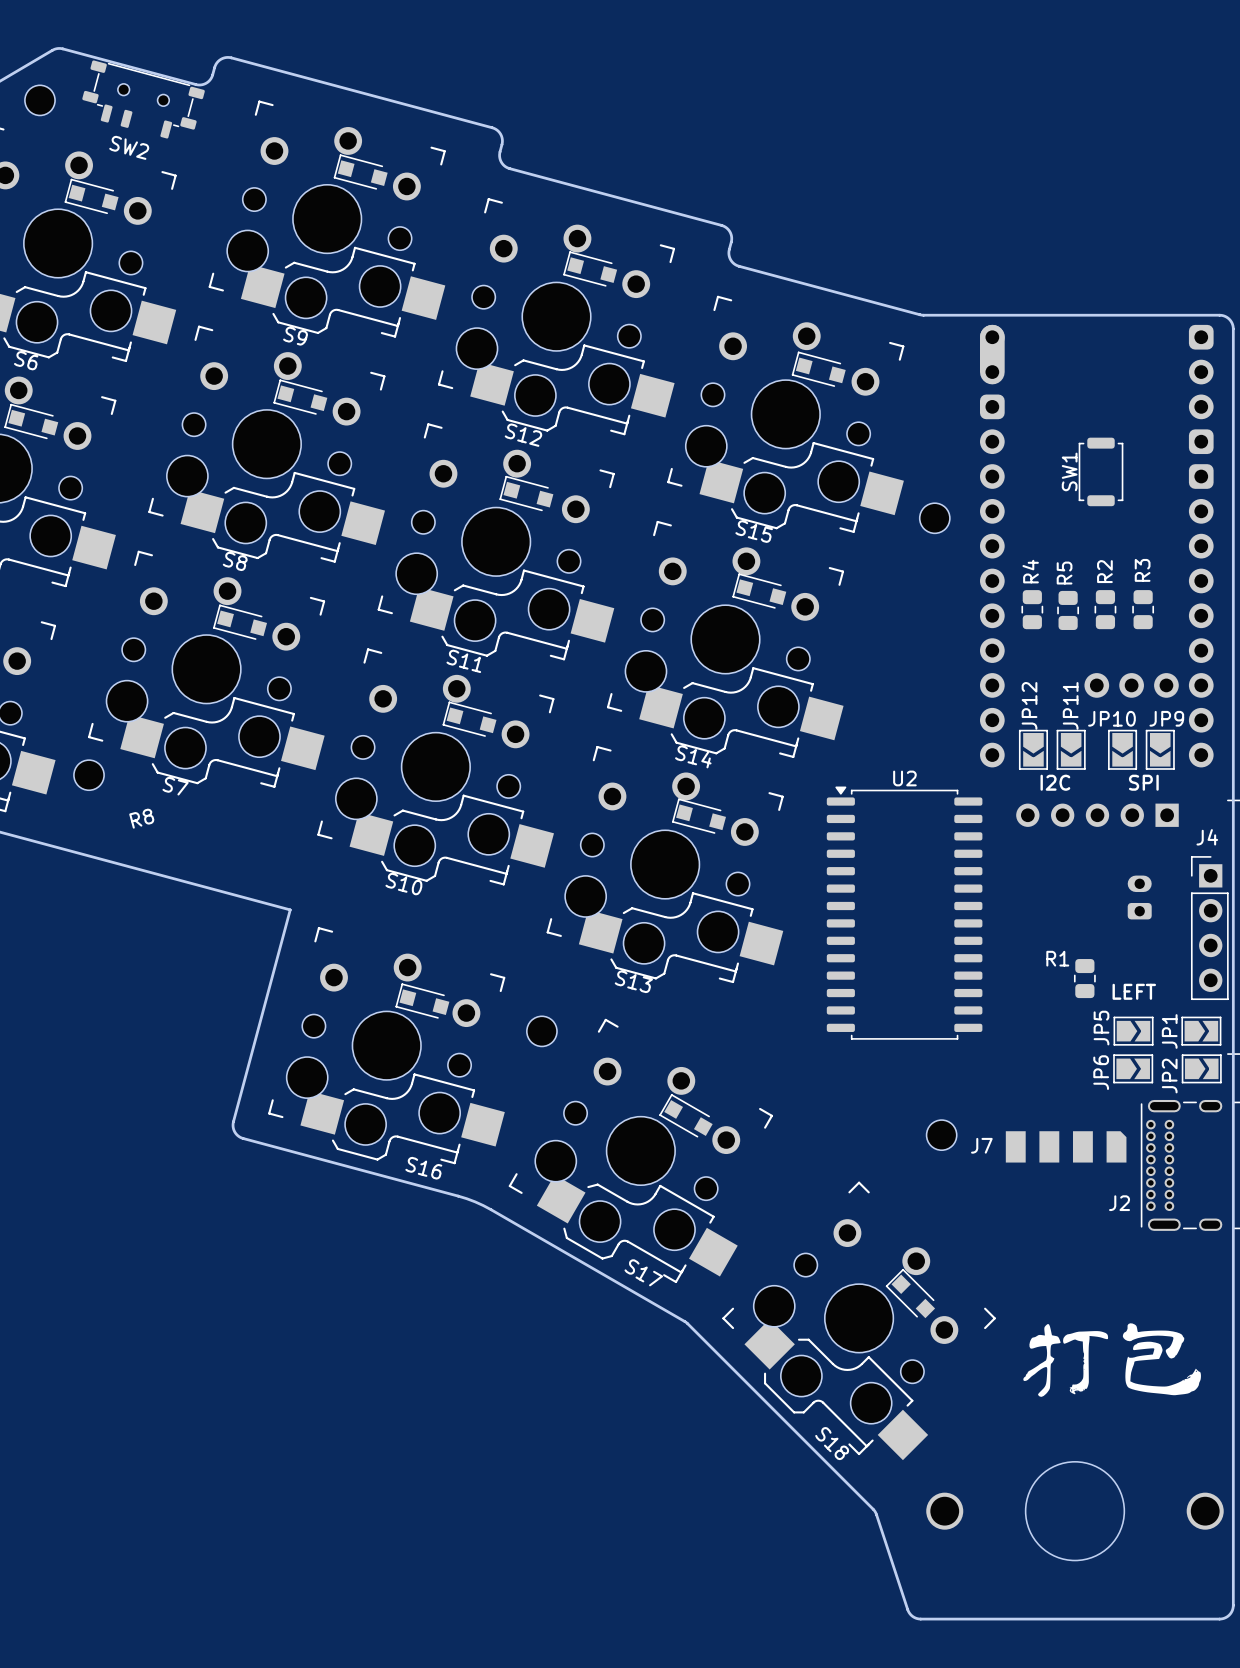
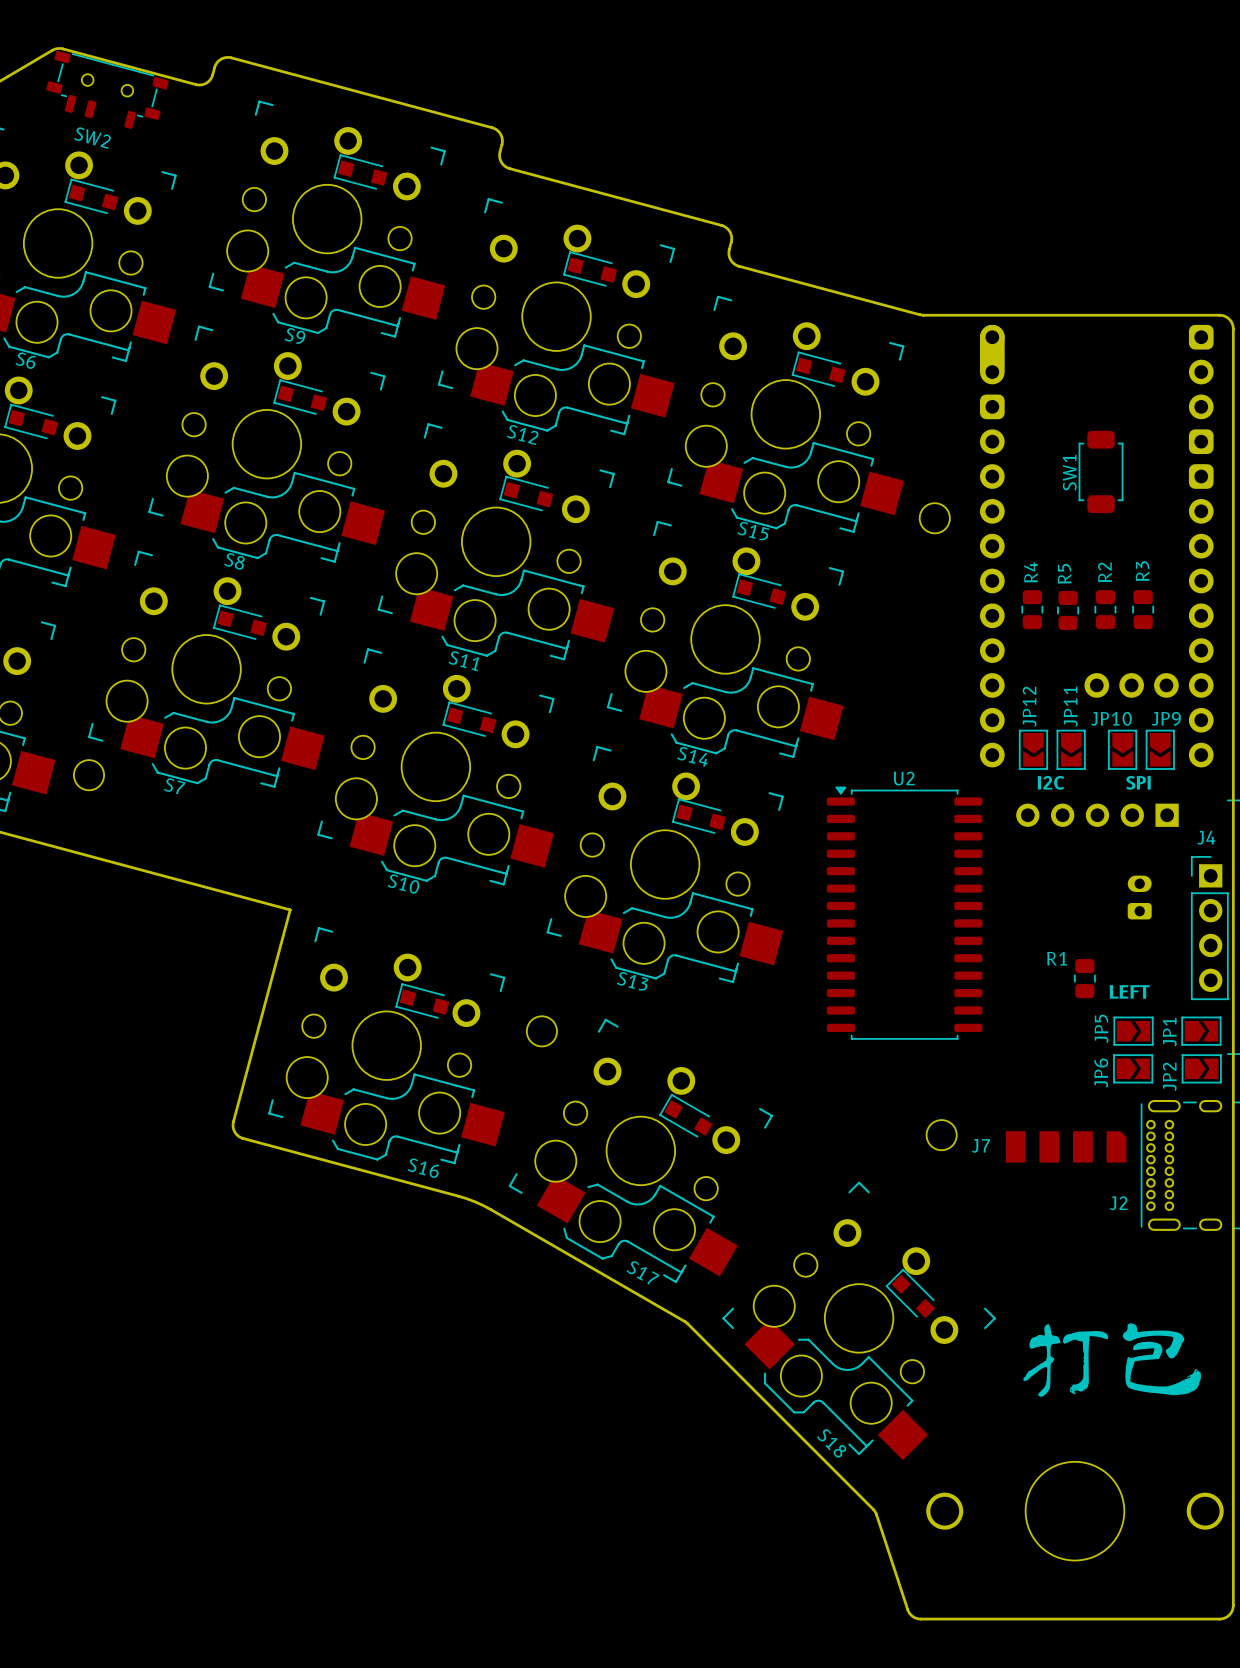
SW2 position: (143, 99) -> (107, 89)
part: (39, 100) -> none
SW1 footprint: [1078, 437, 1124, 507] -> [1078, 430, 1124, 514]
R8: (141, 818) -> none

